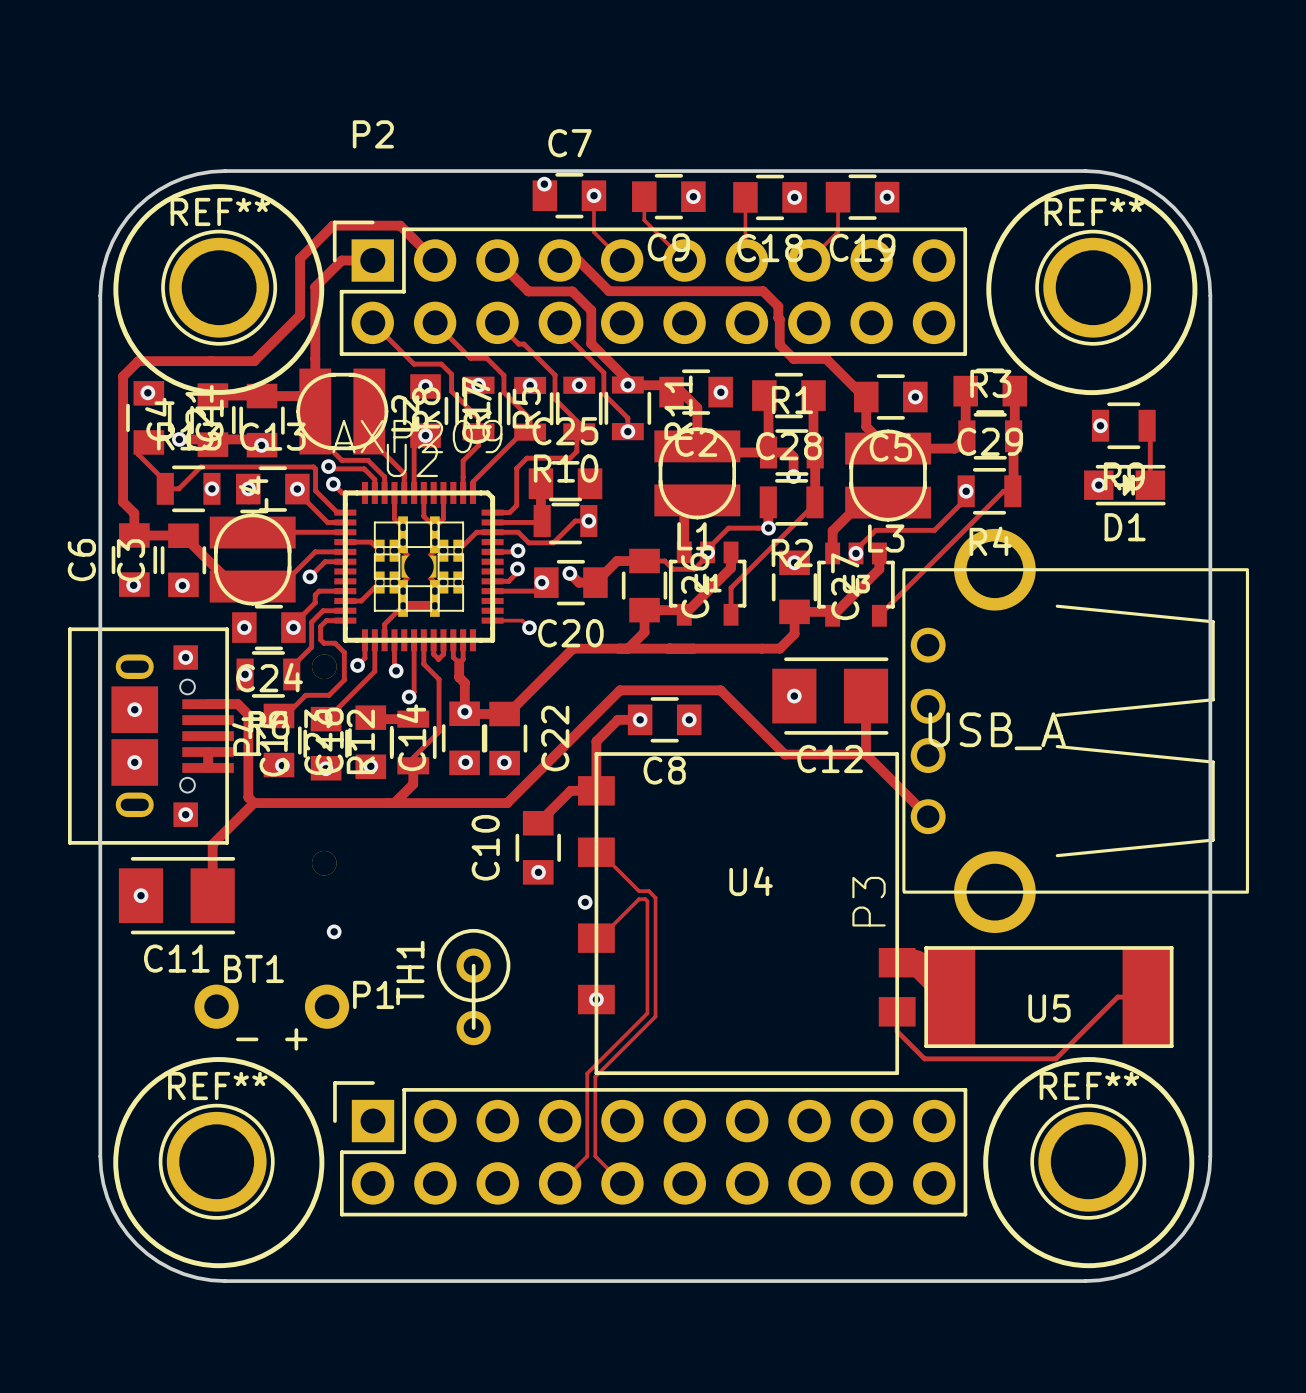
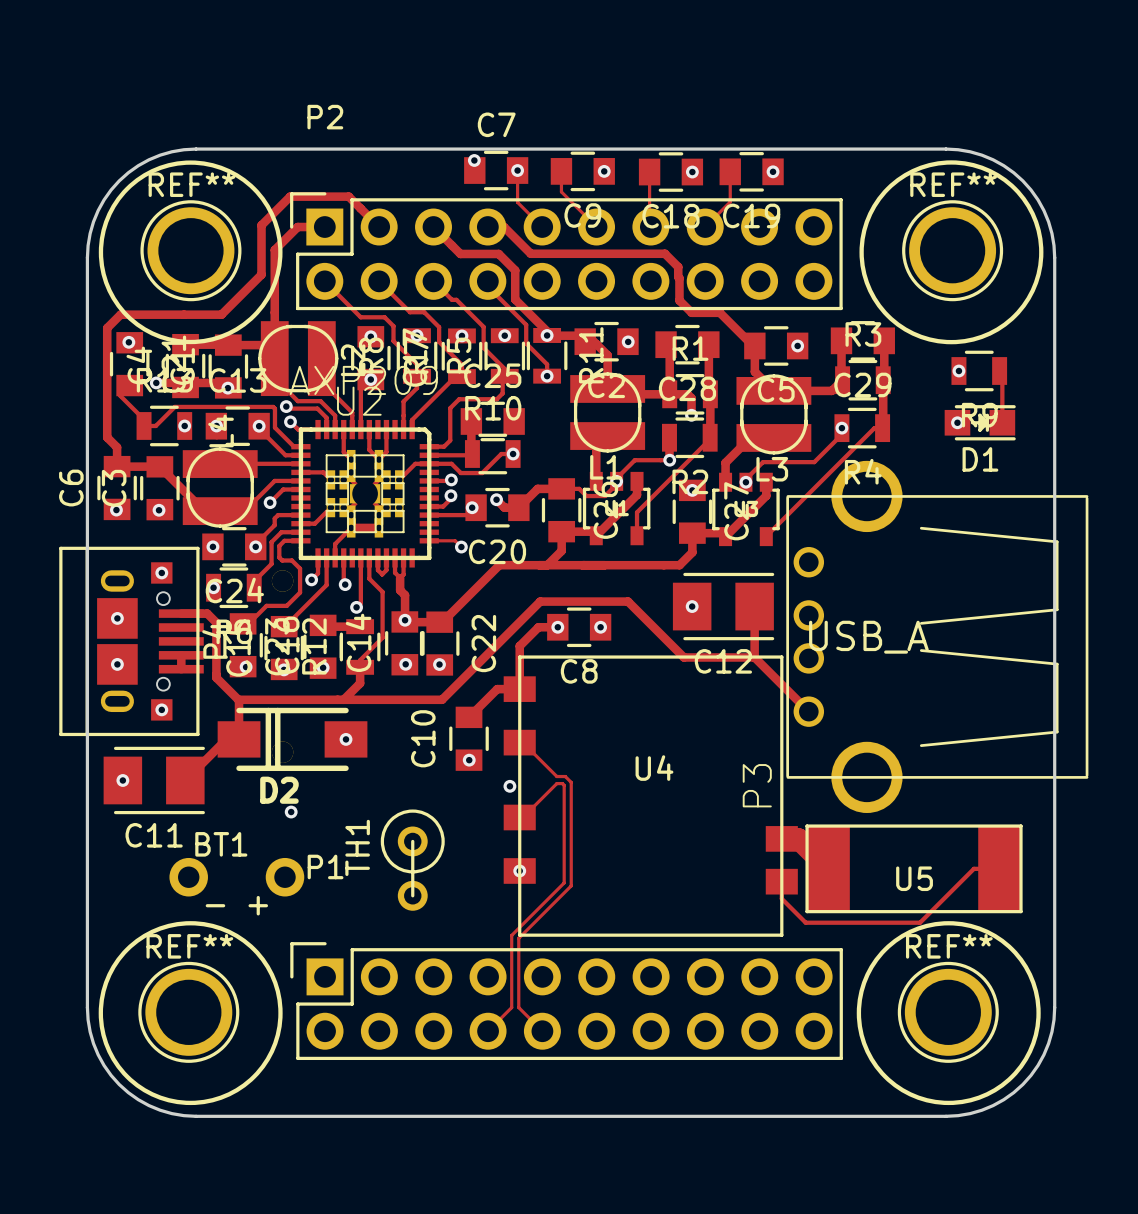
track: (248, 777) (248, 797) (253, 803) -> none
track: (253, 803) (212, 844) (212, 895) -> (216, 677) (239, 700) (239, 739) (226, 739) (185, 780)
track: (253, 803) (273, 803) -> none
D2: none -> (292, 739)
via: none -> (346, 739)

